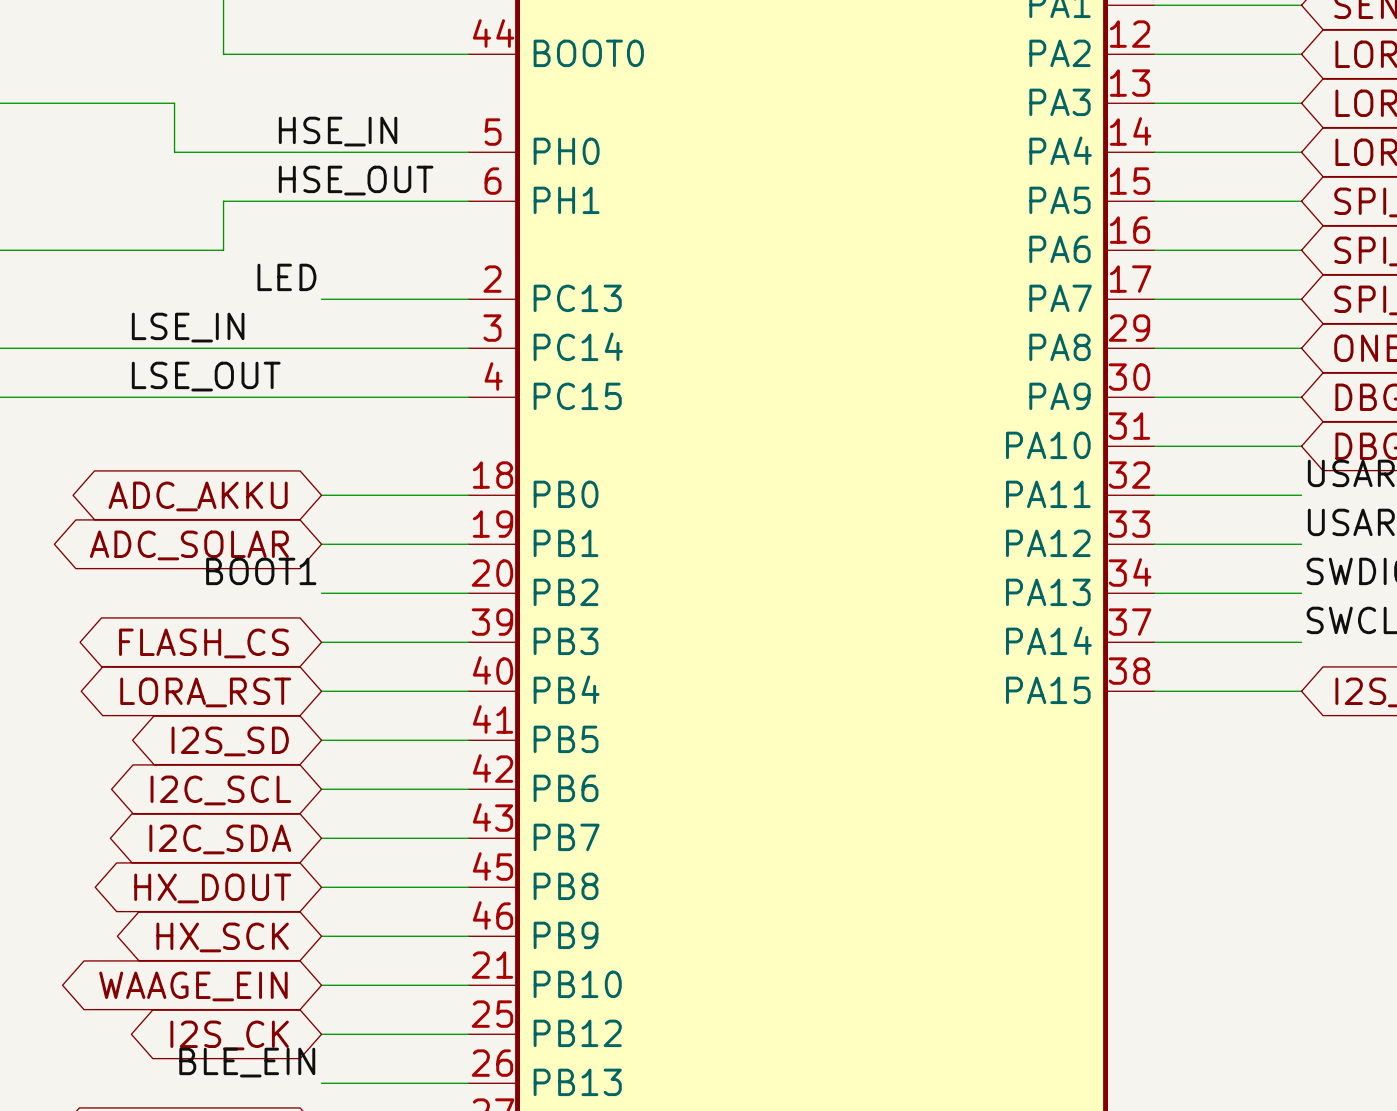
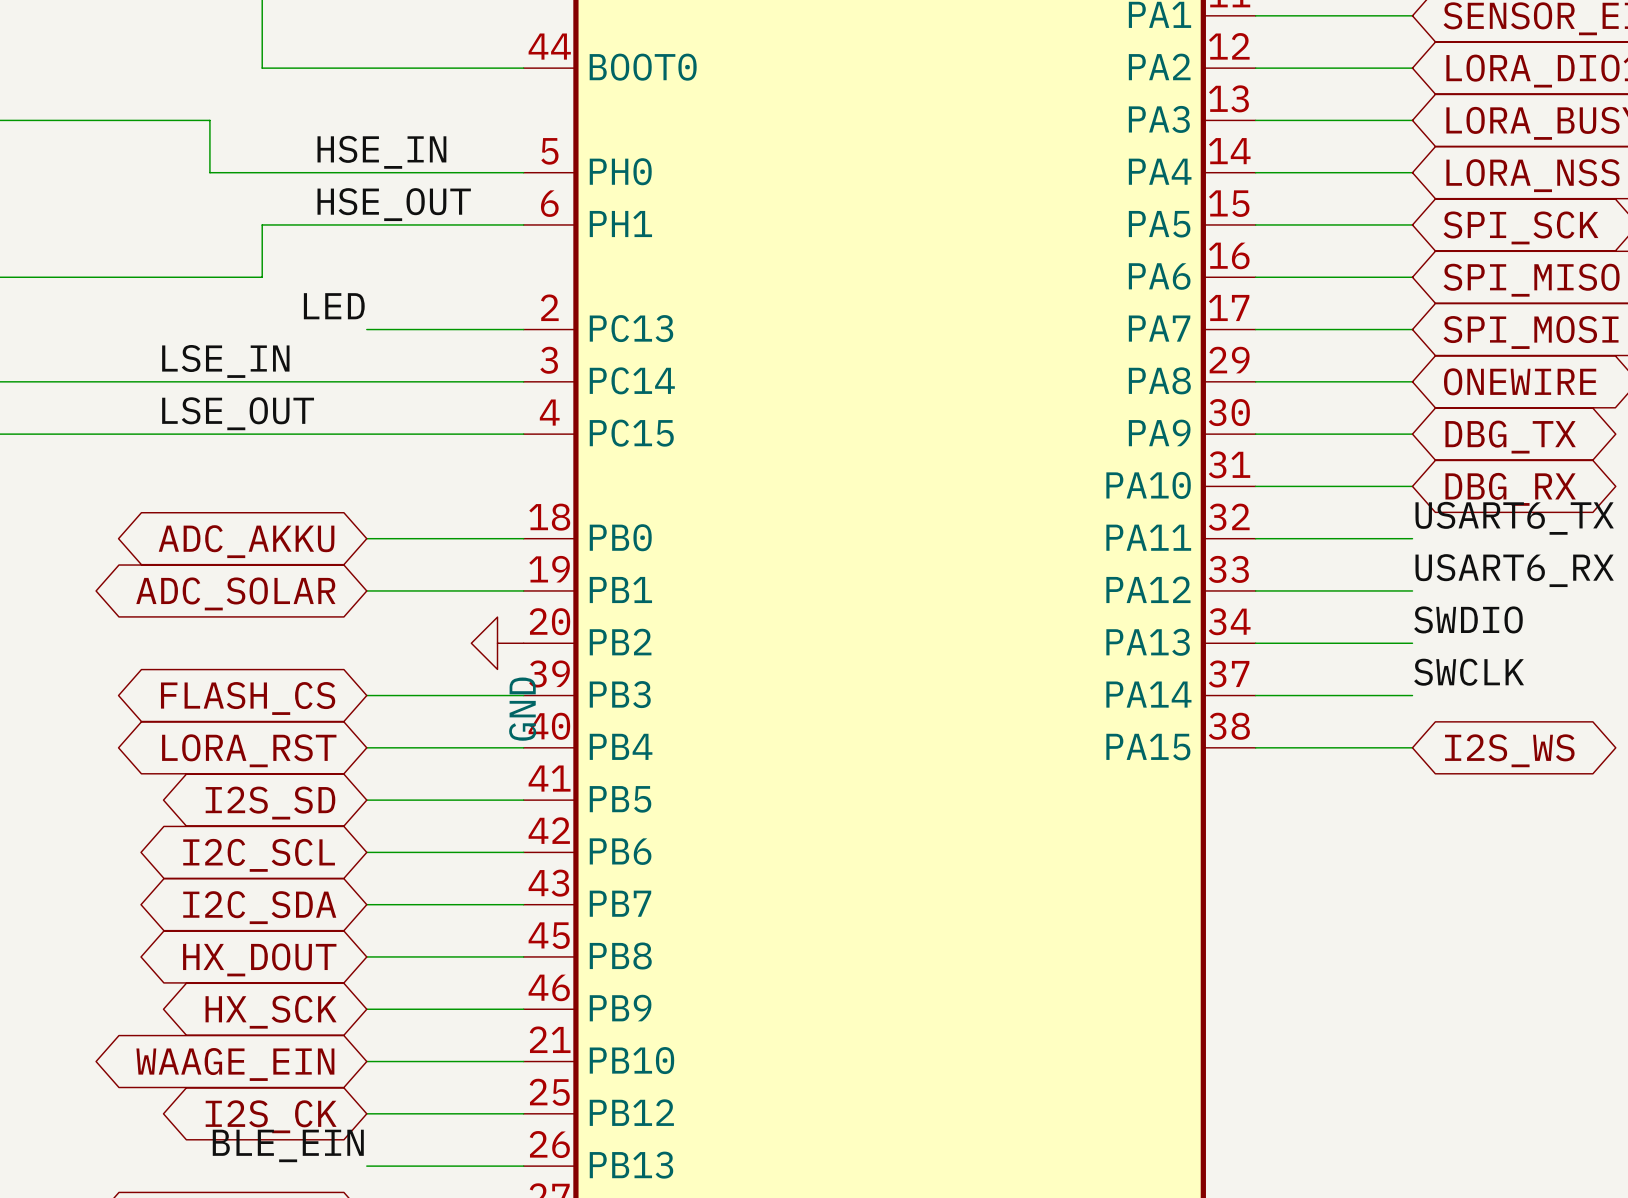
label: BOOT1 (261, 571) -> none
wire: (321, 593) (468, 593) -> none
power symbol: none -> GND (497, 643)

